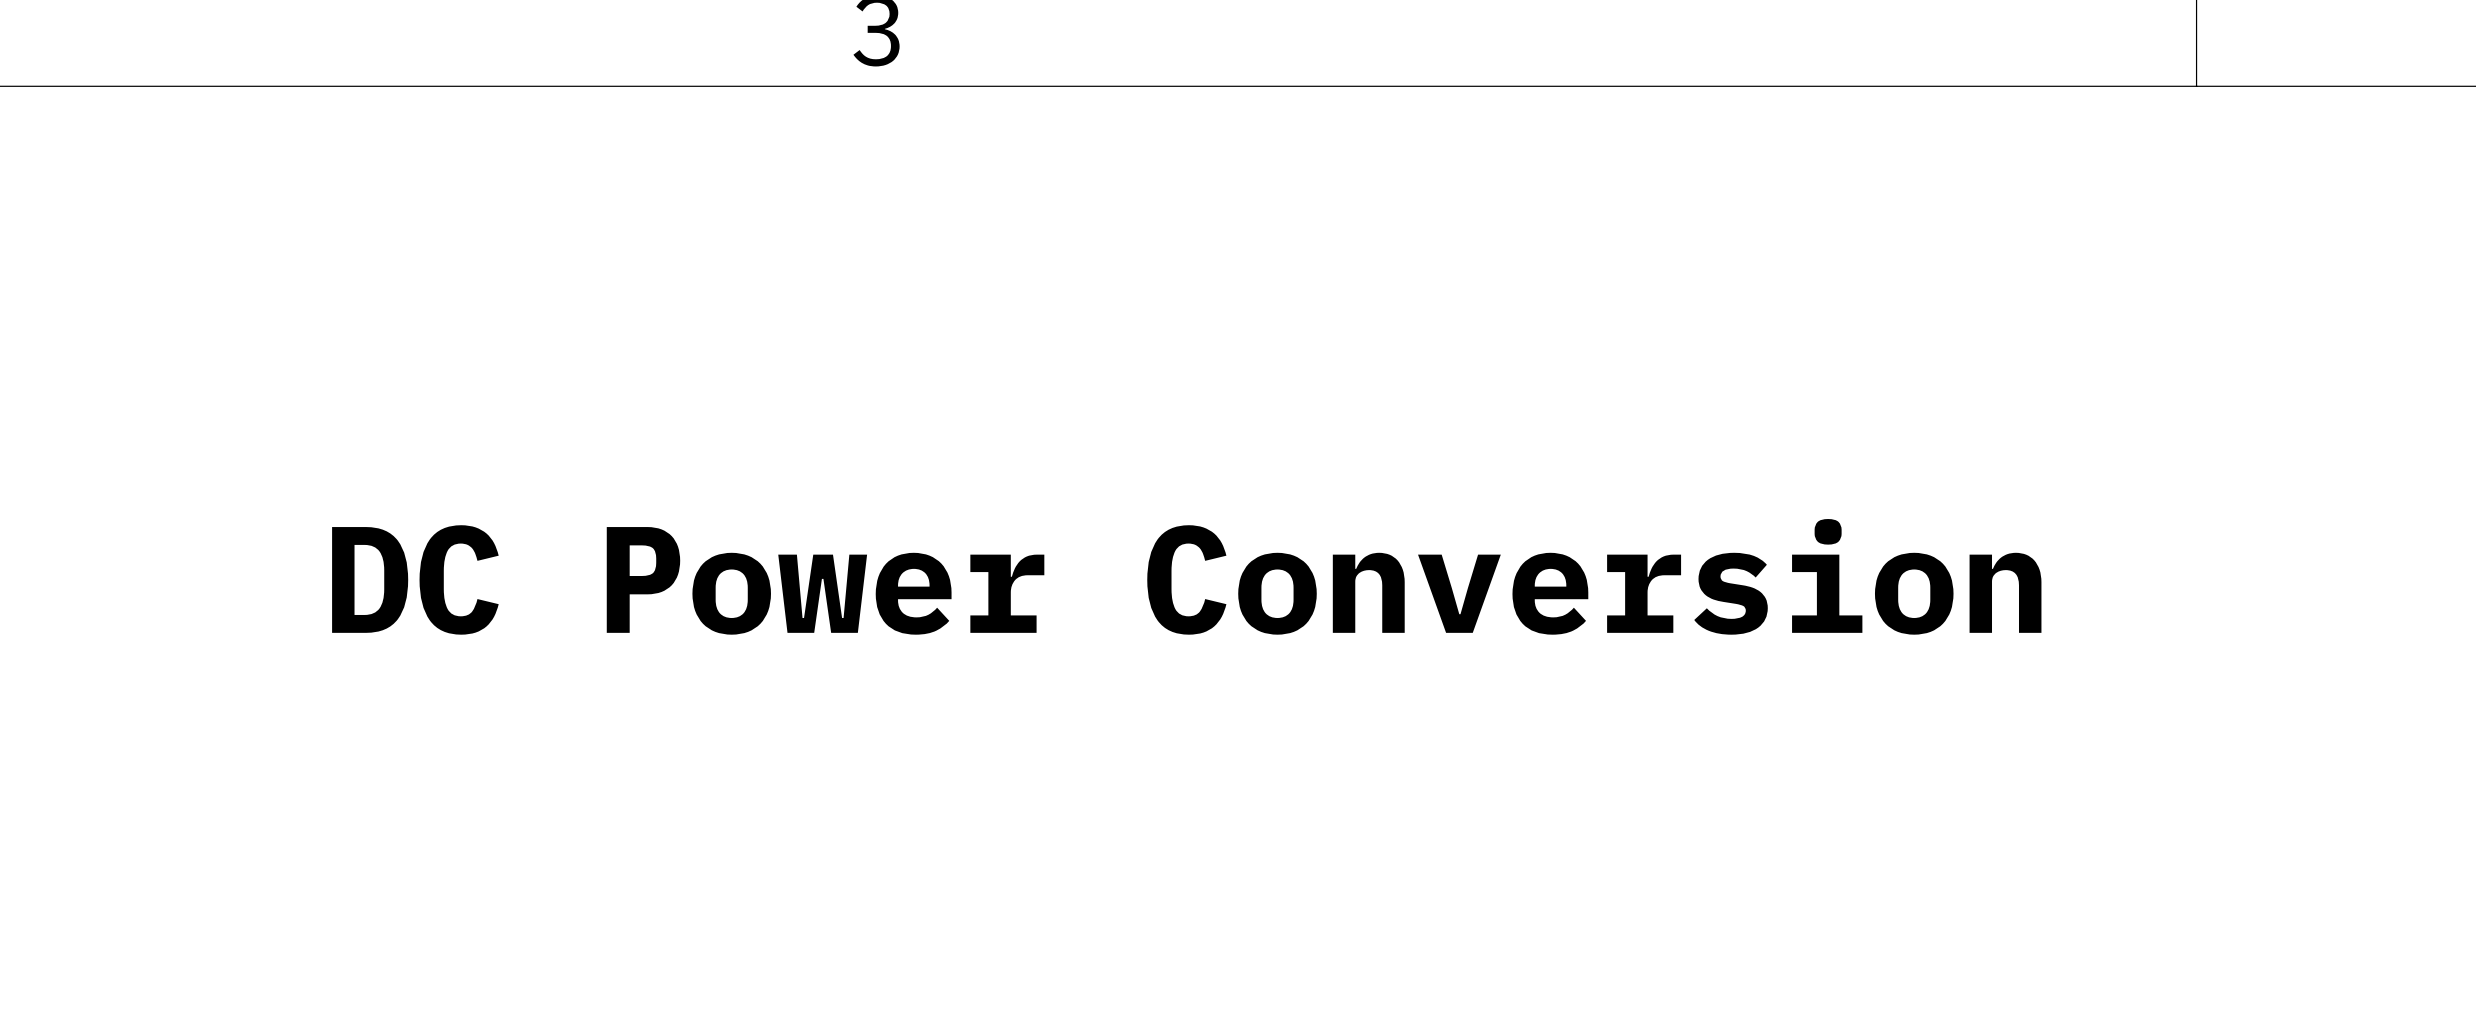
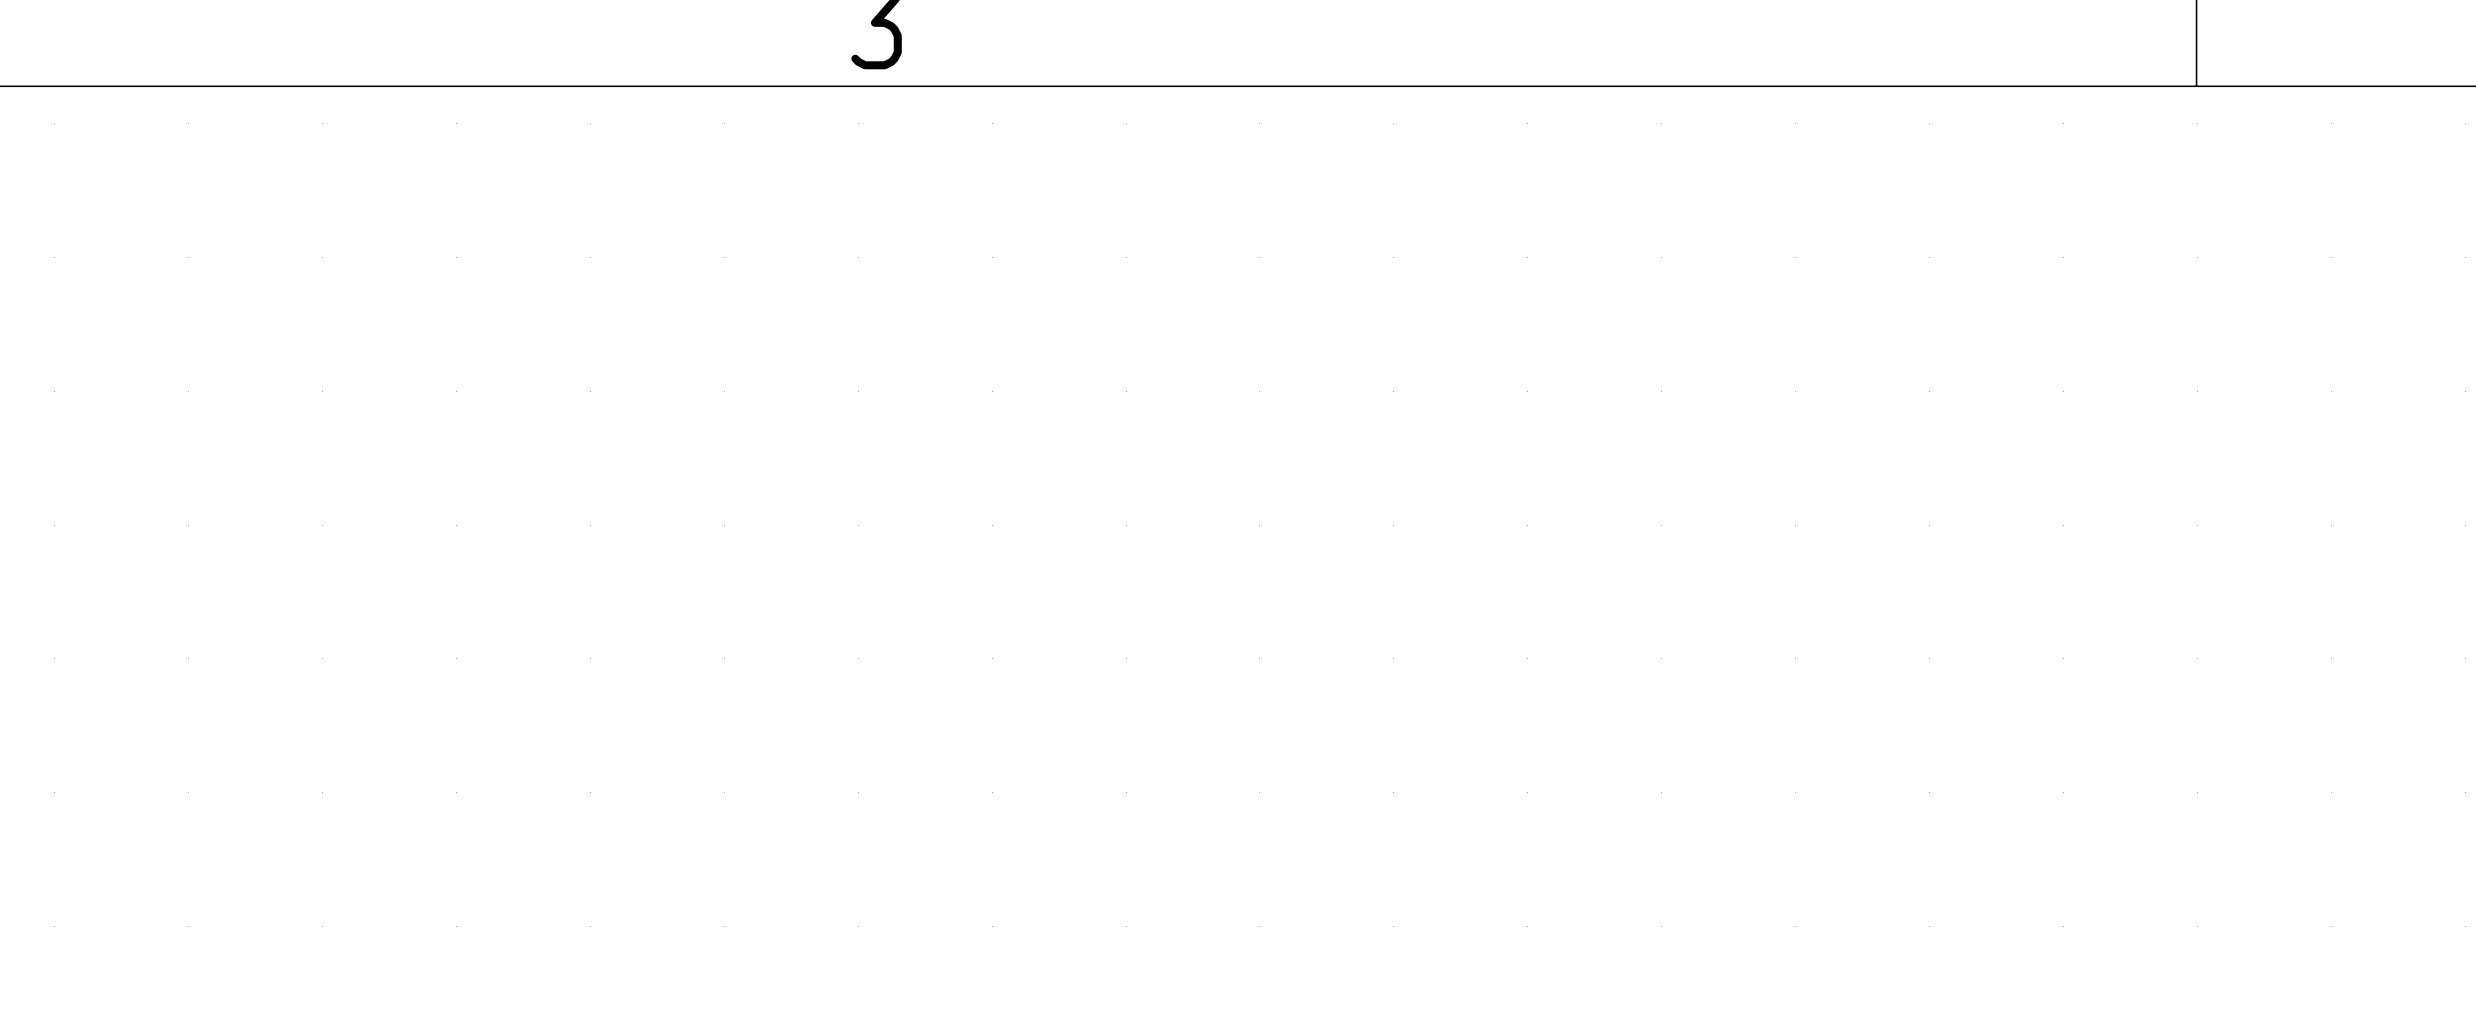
text: DC Power Conversion (1186, 576) -> none

